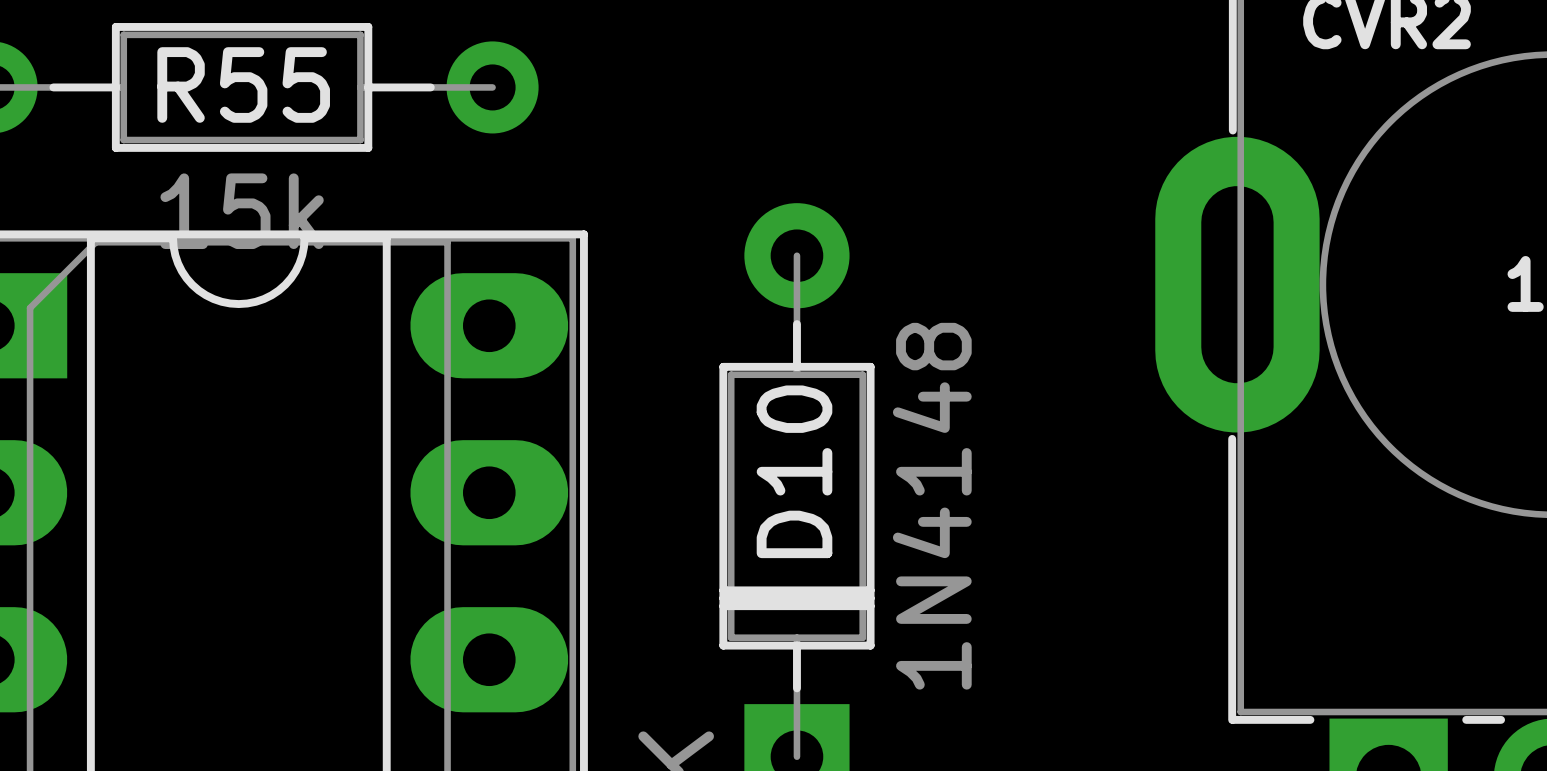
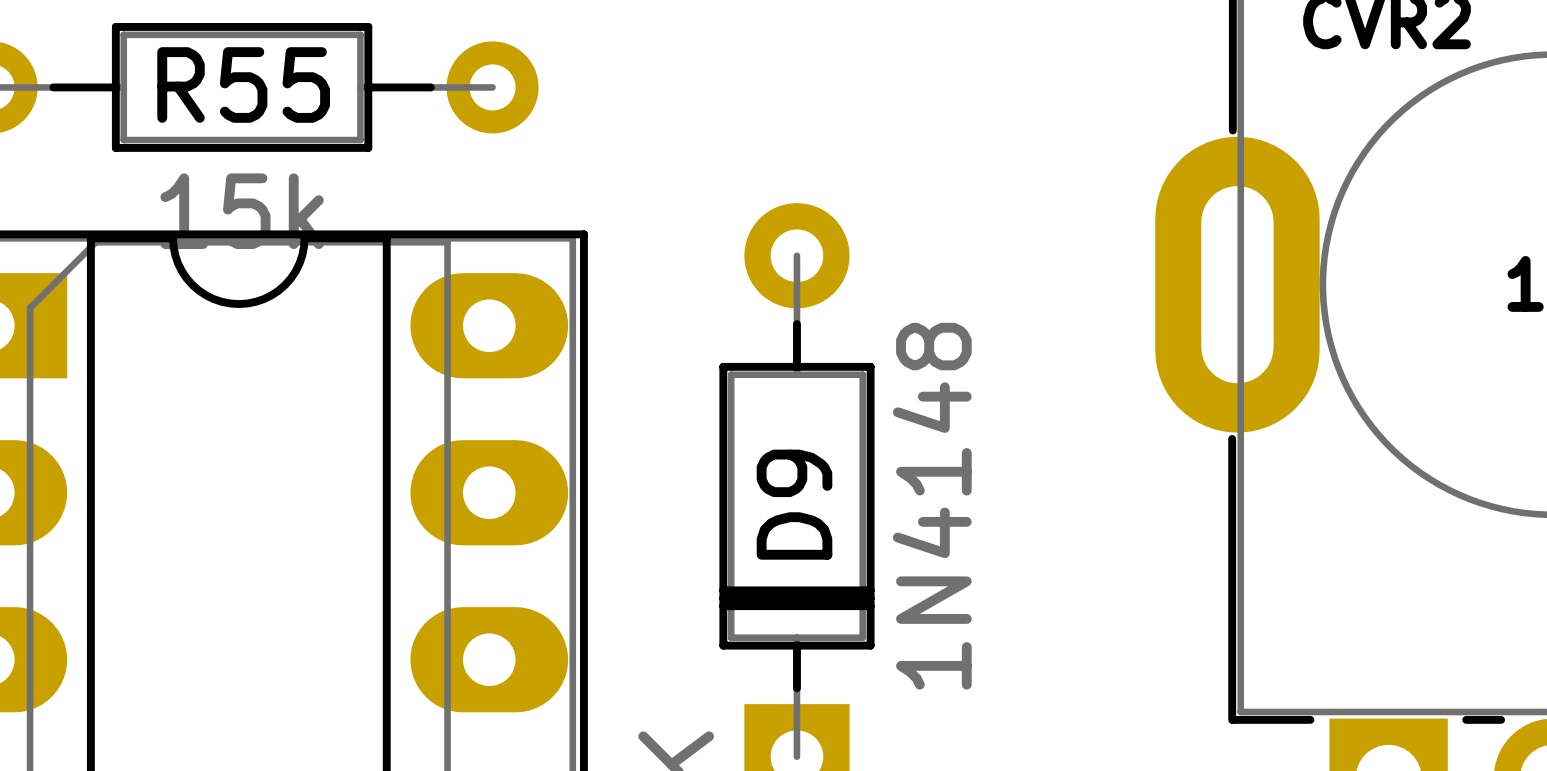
D10 name: D10 (794, 471) -> D9 (794, 504)

